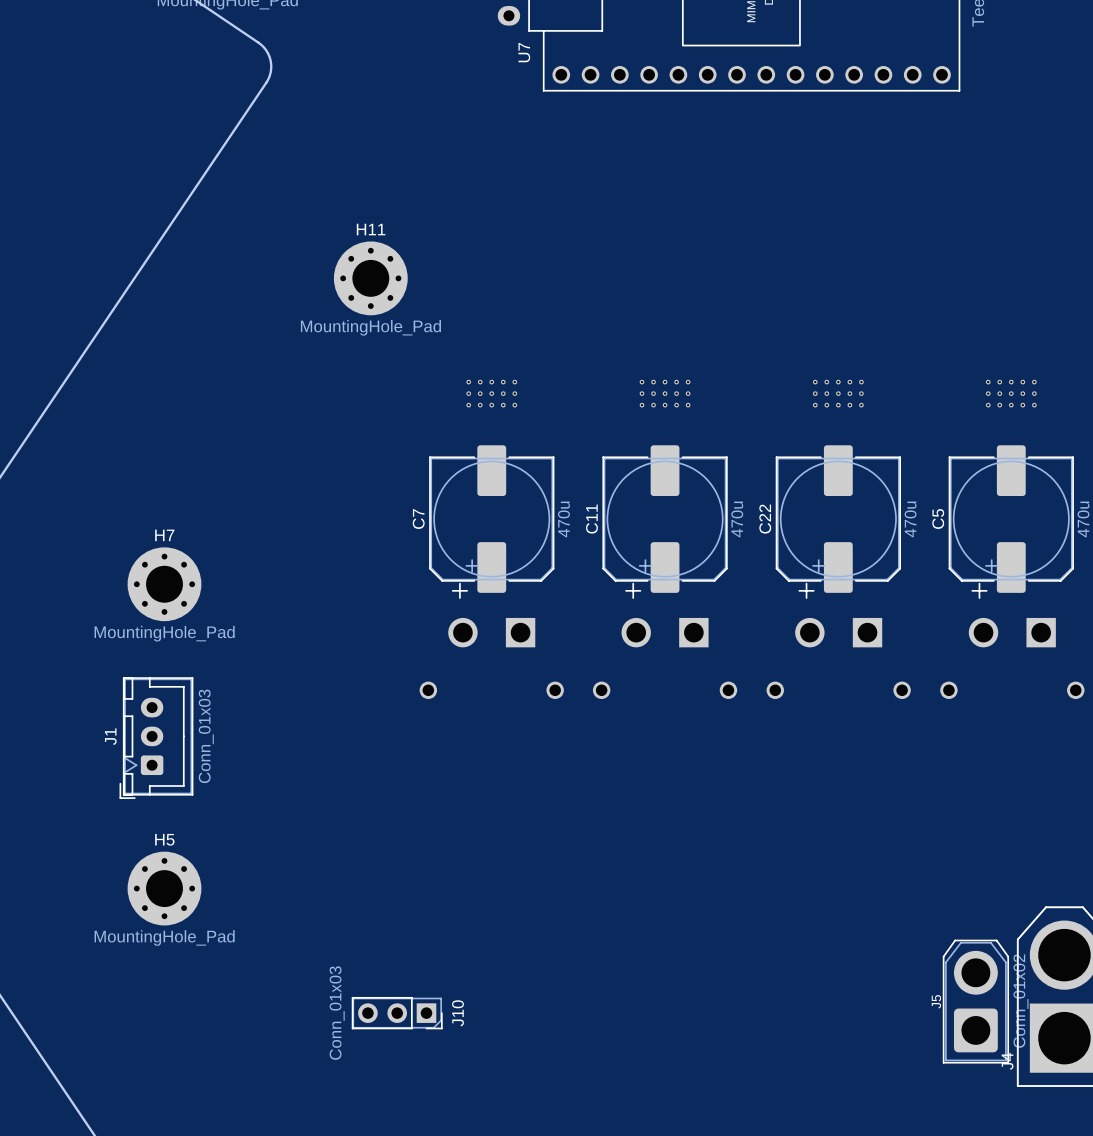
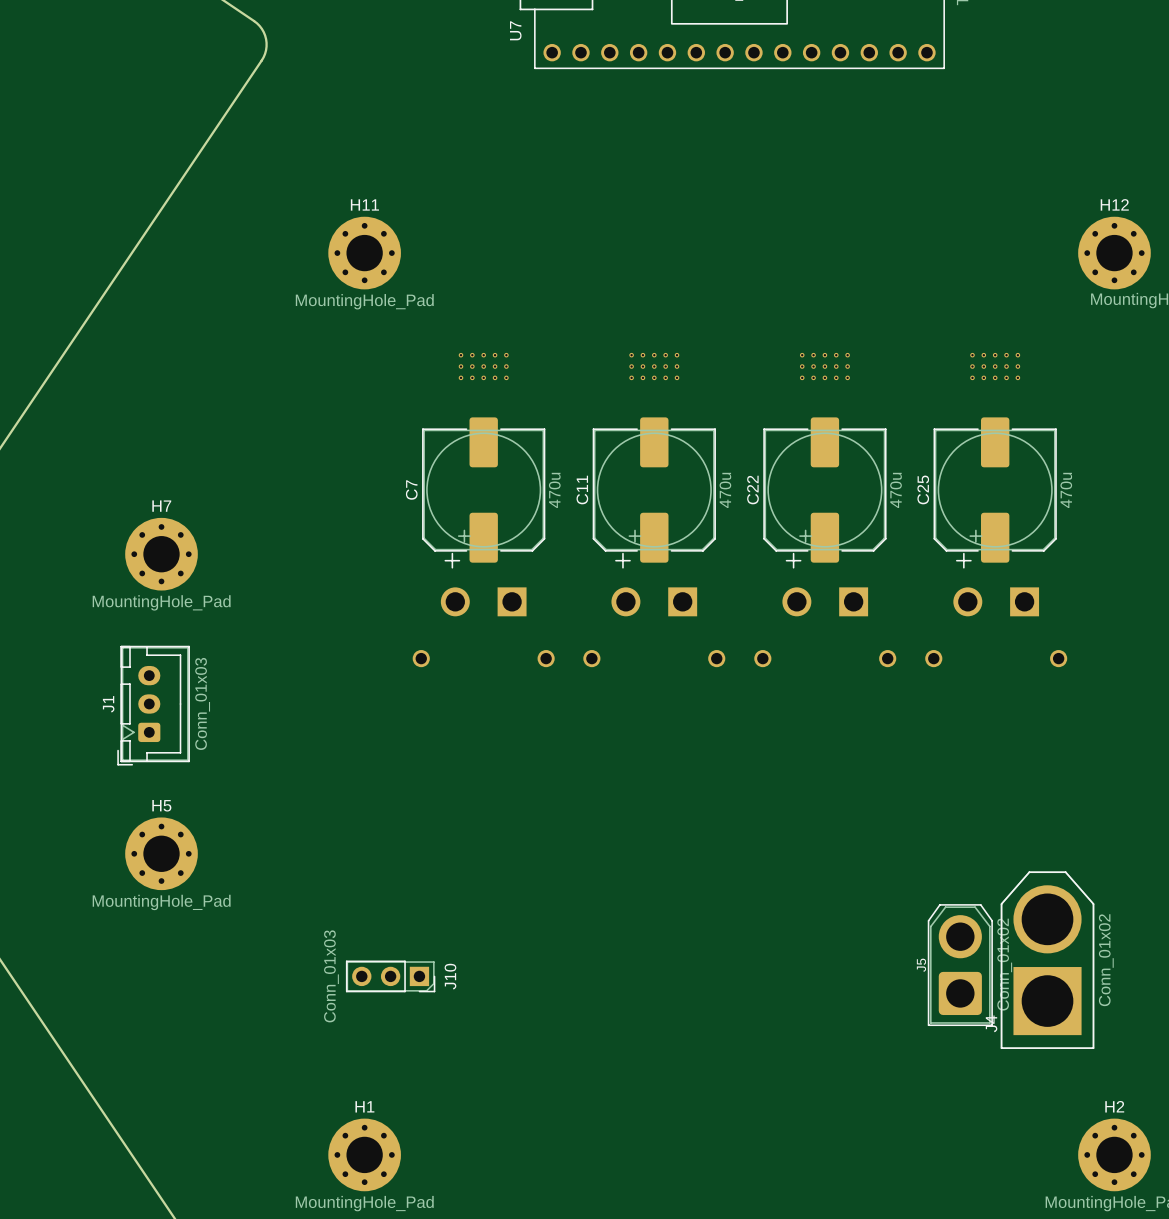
C5 name: C5 (938, 519) -> C25 (923, 489)

